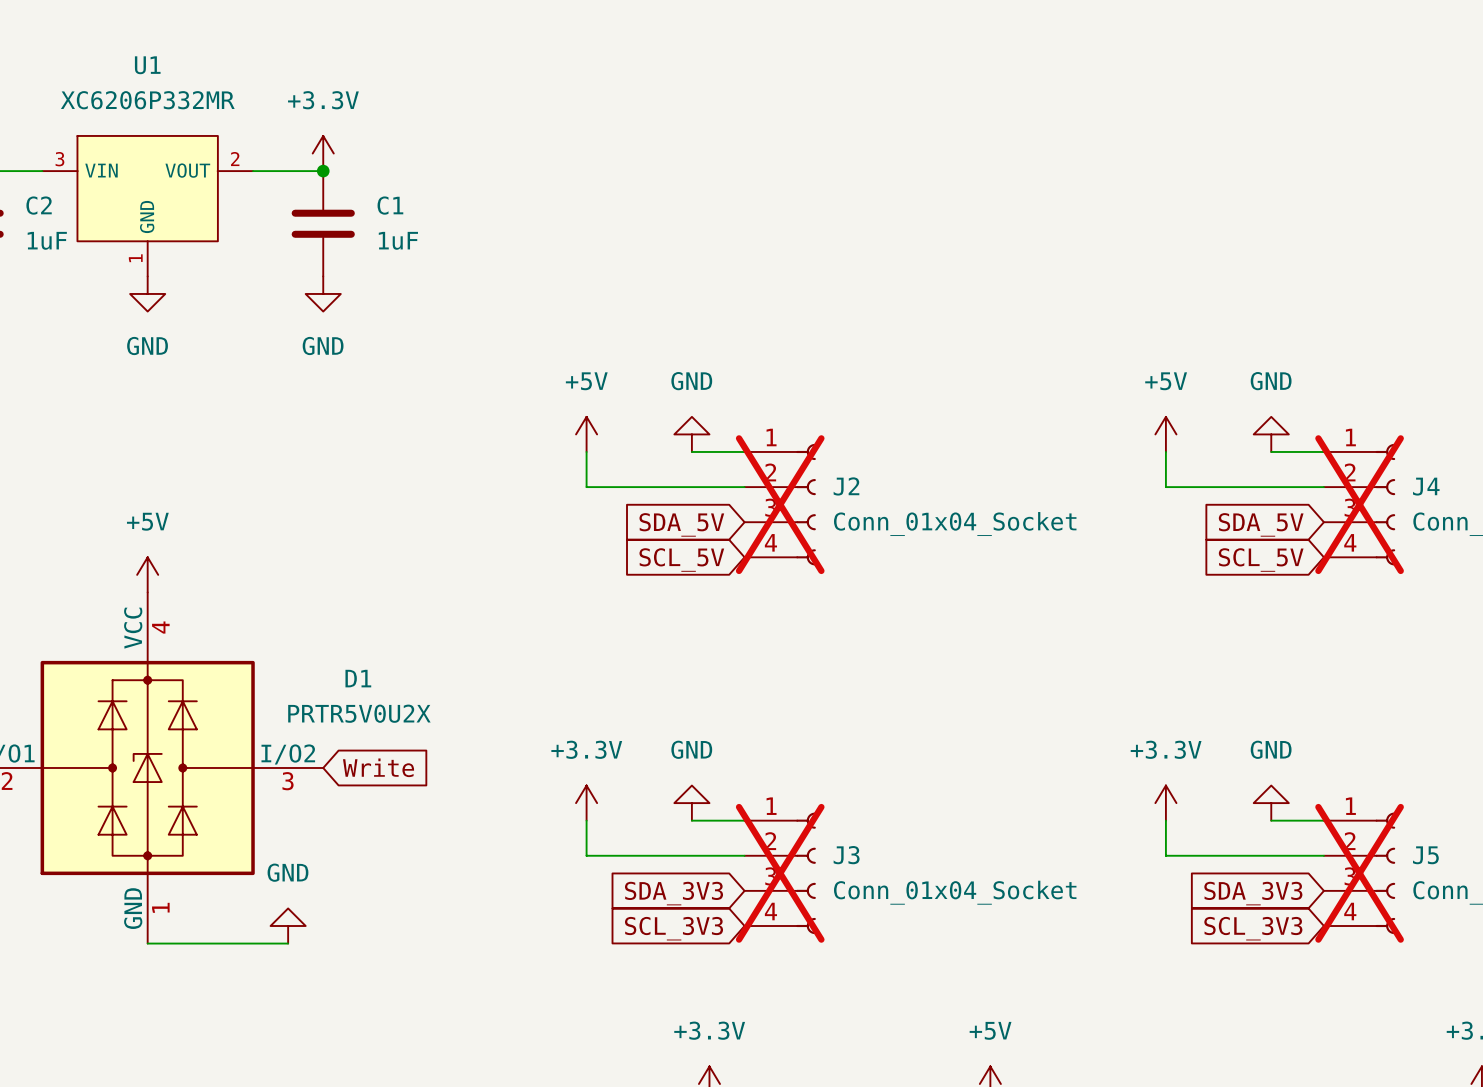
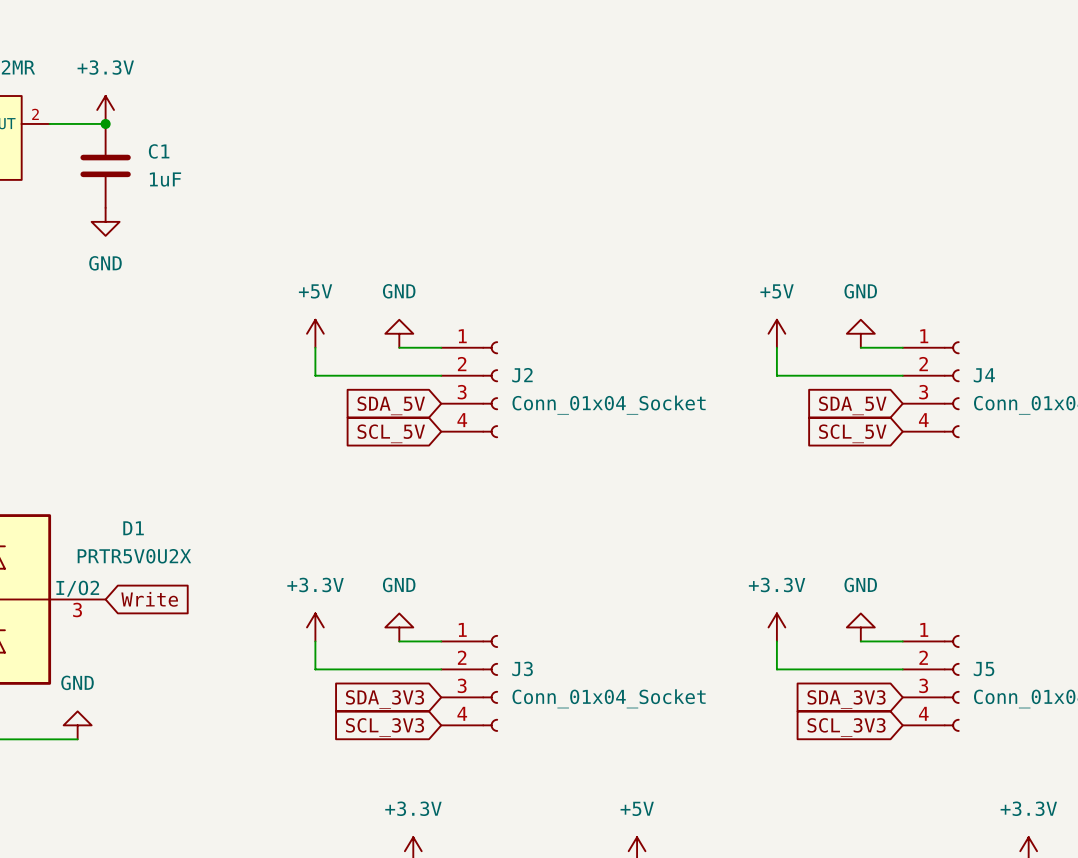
J2 do-not-place cross: (780, 504) -> none
J4 do-not-place cross: (1359, 504) -> none
J3 do-not-place cross: (780, 873) -> none
J5 do-not-place cross: (1359, 873) -> none

